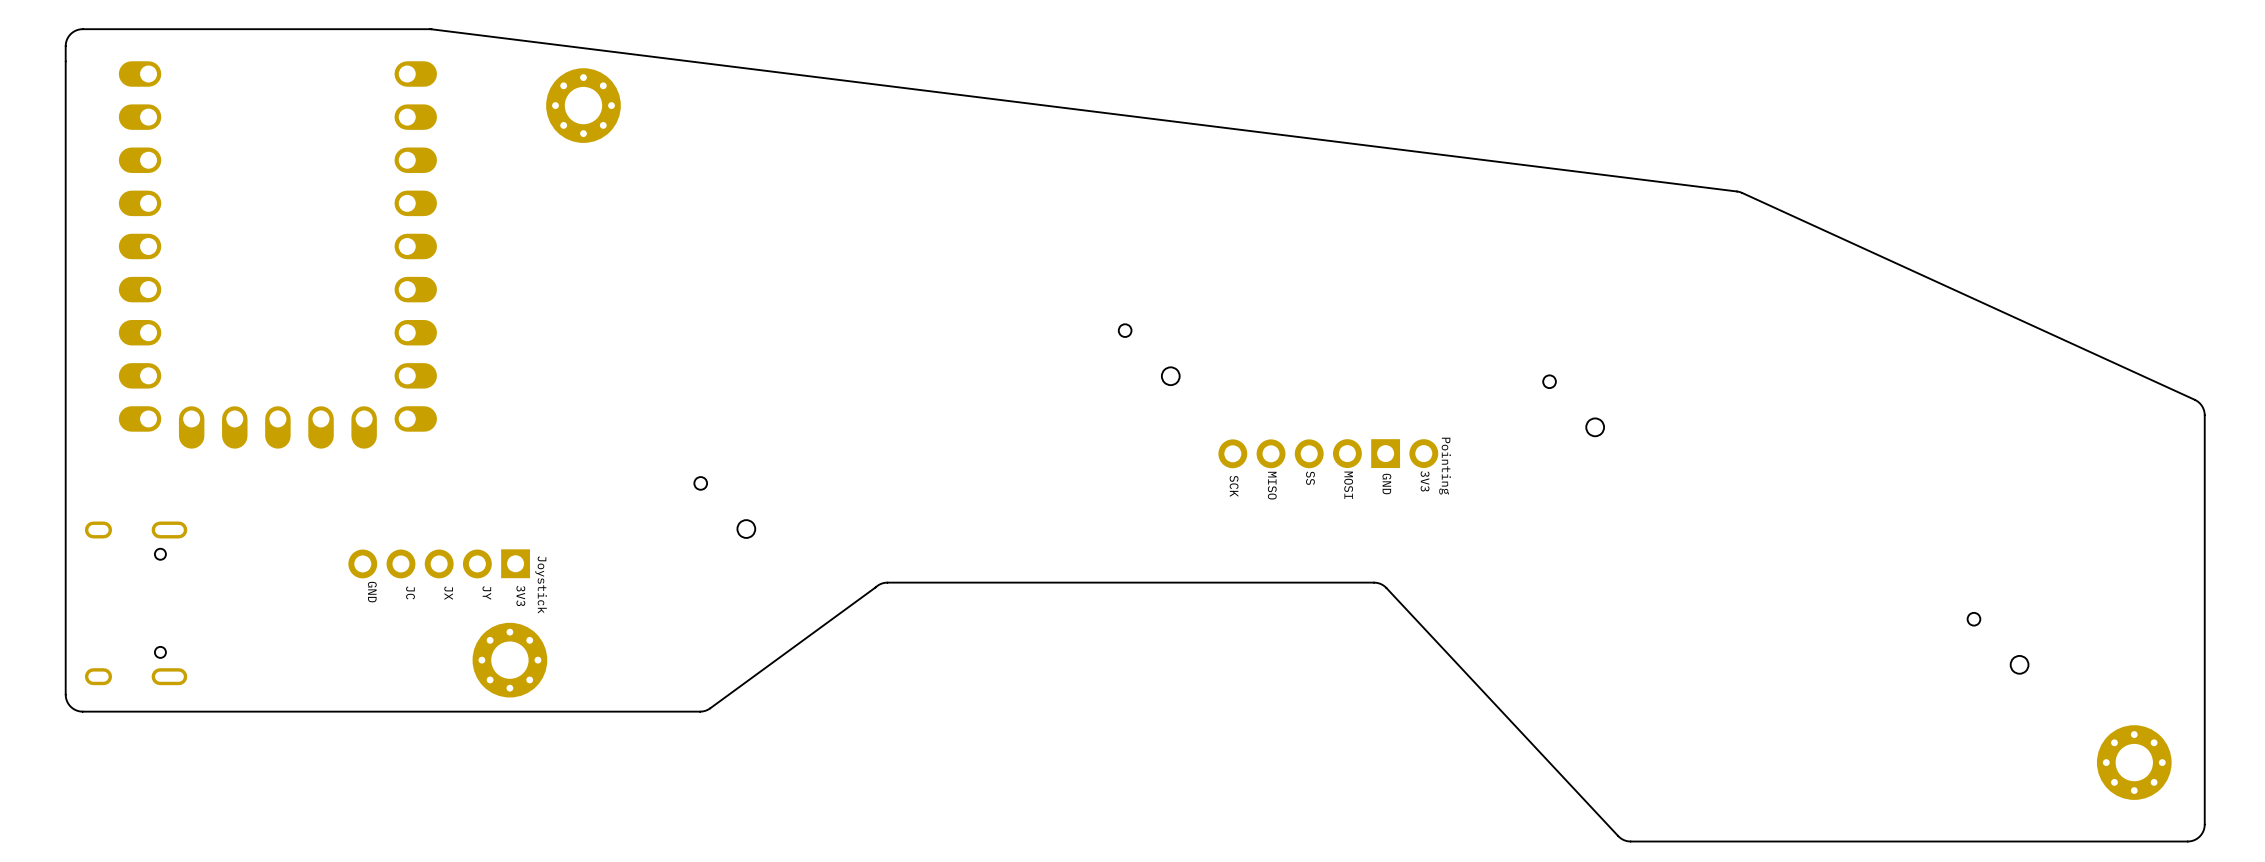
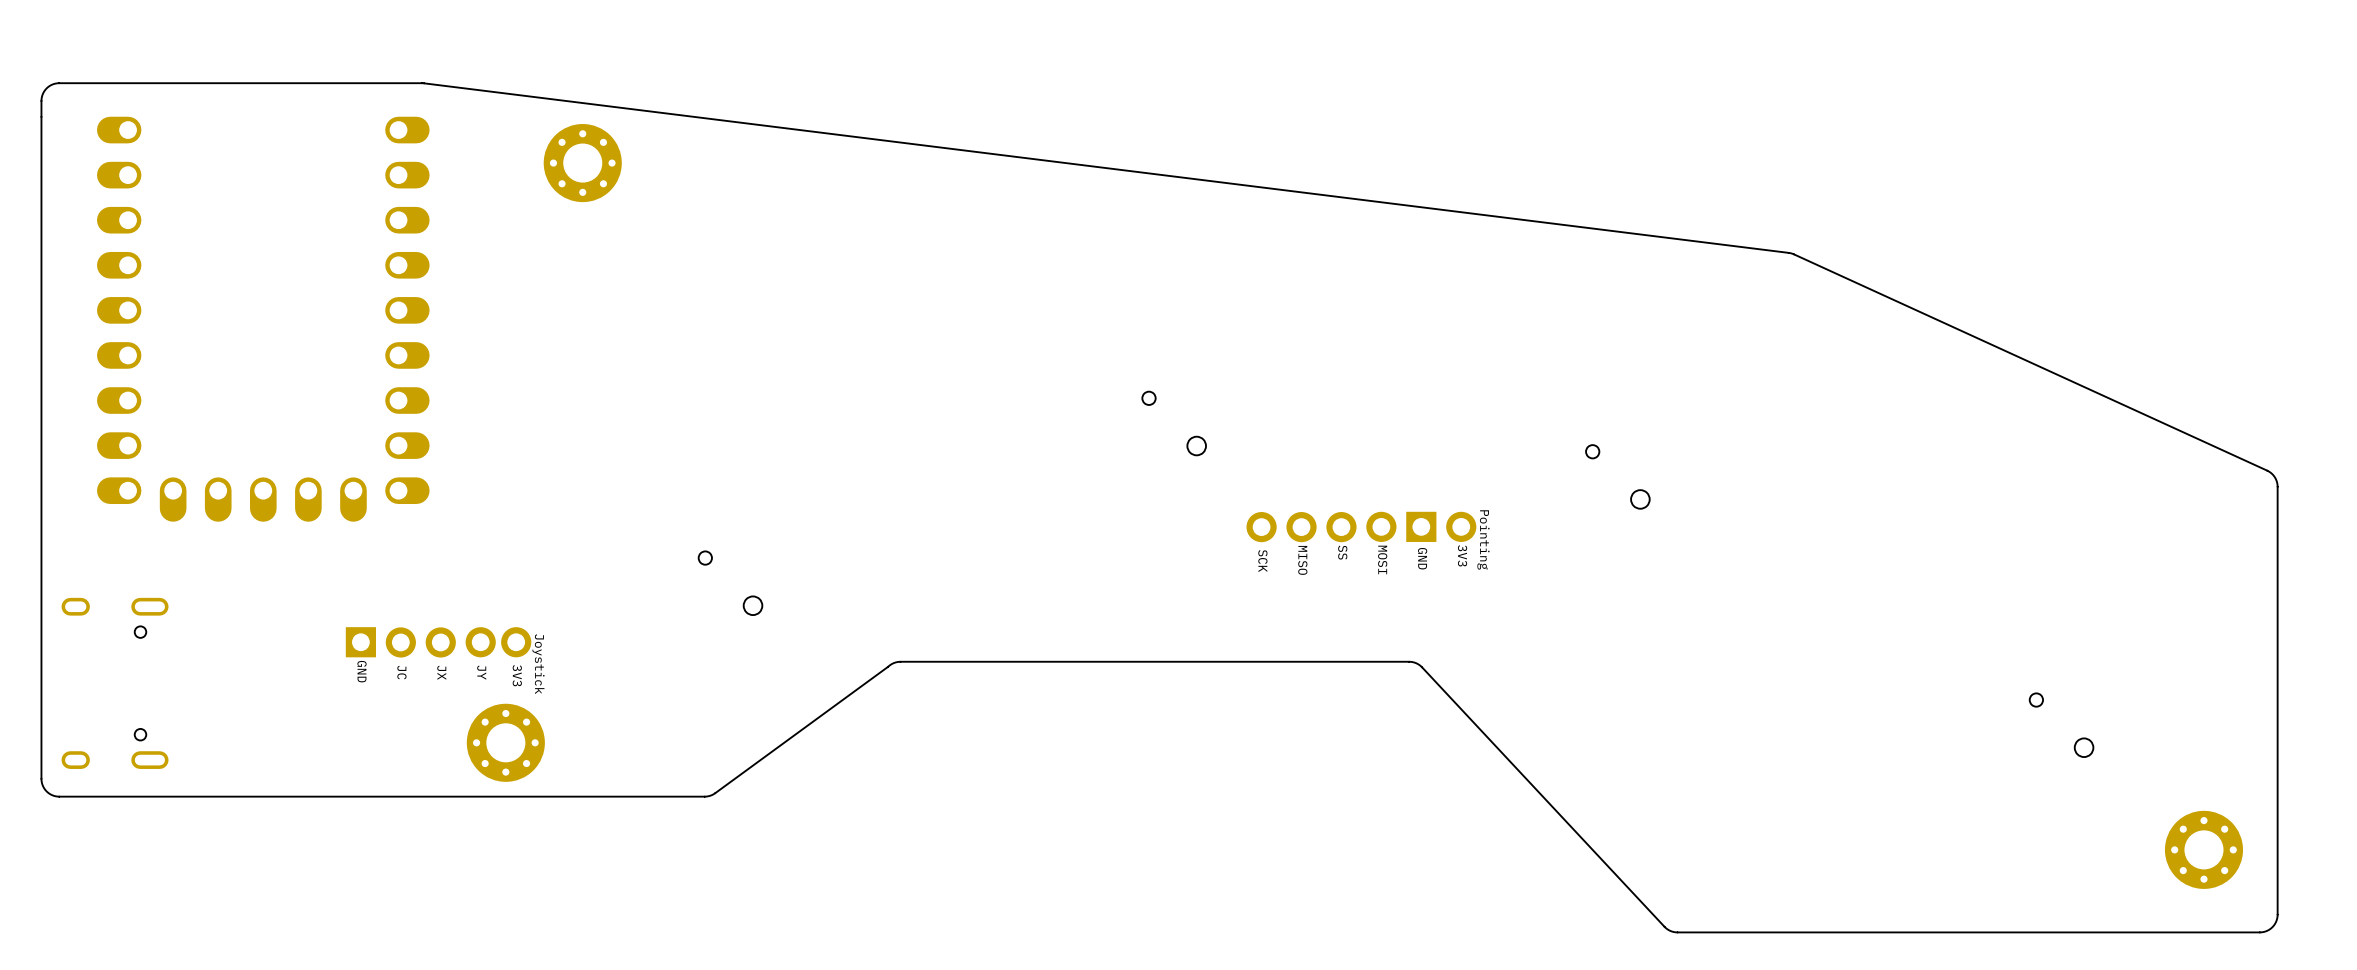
part footprint: [348, 549, 531, 579] -> [345, 627, 532, 658]

